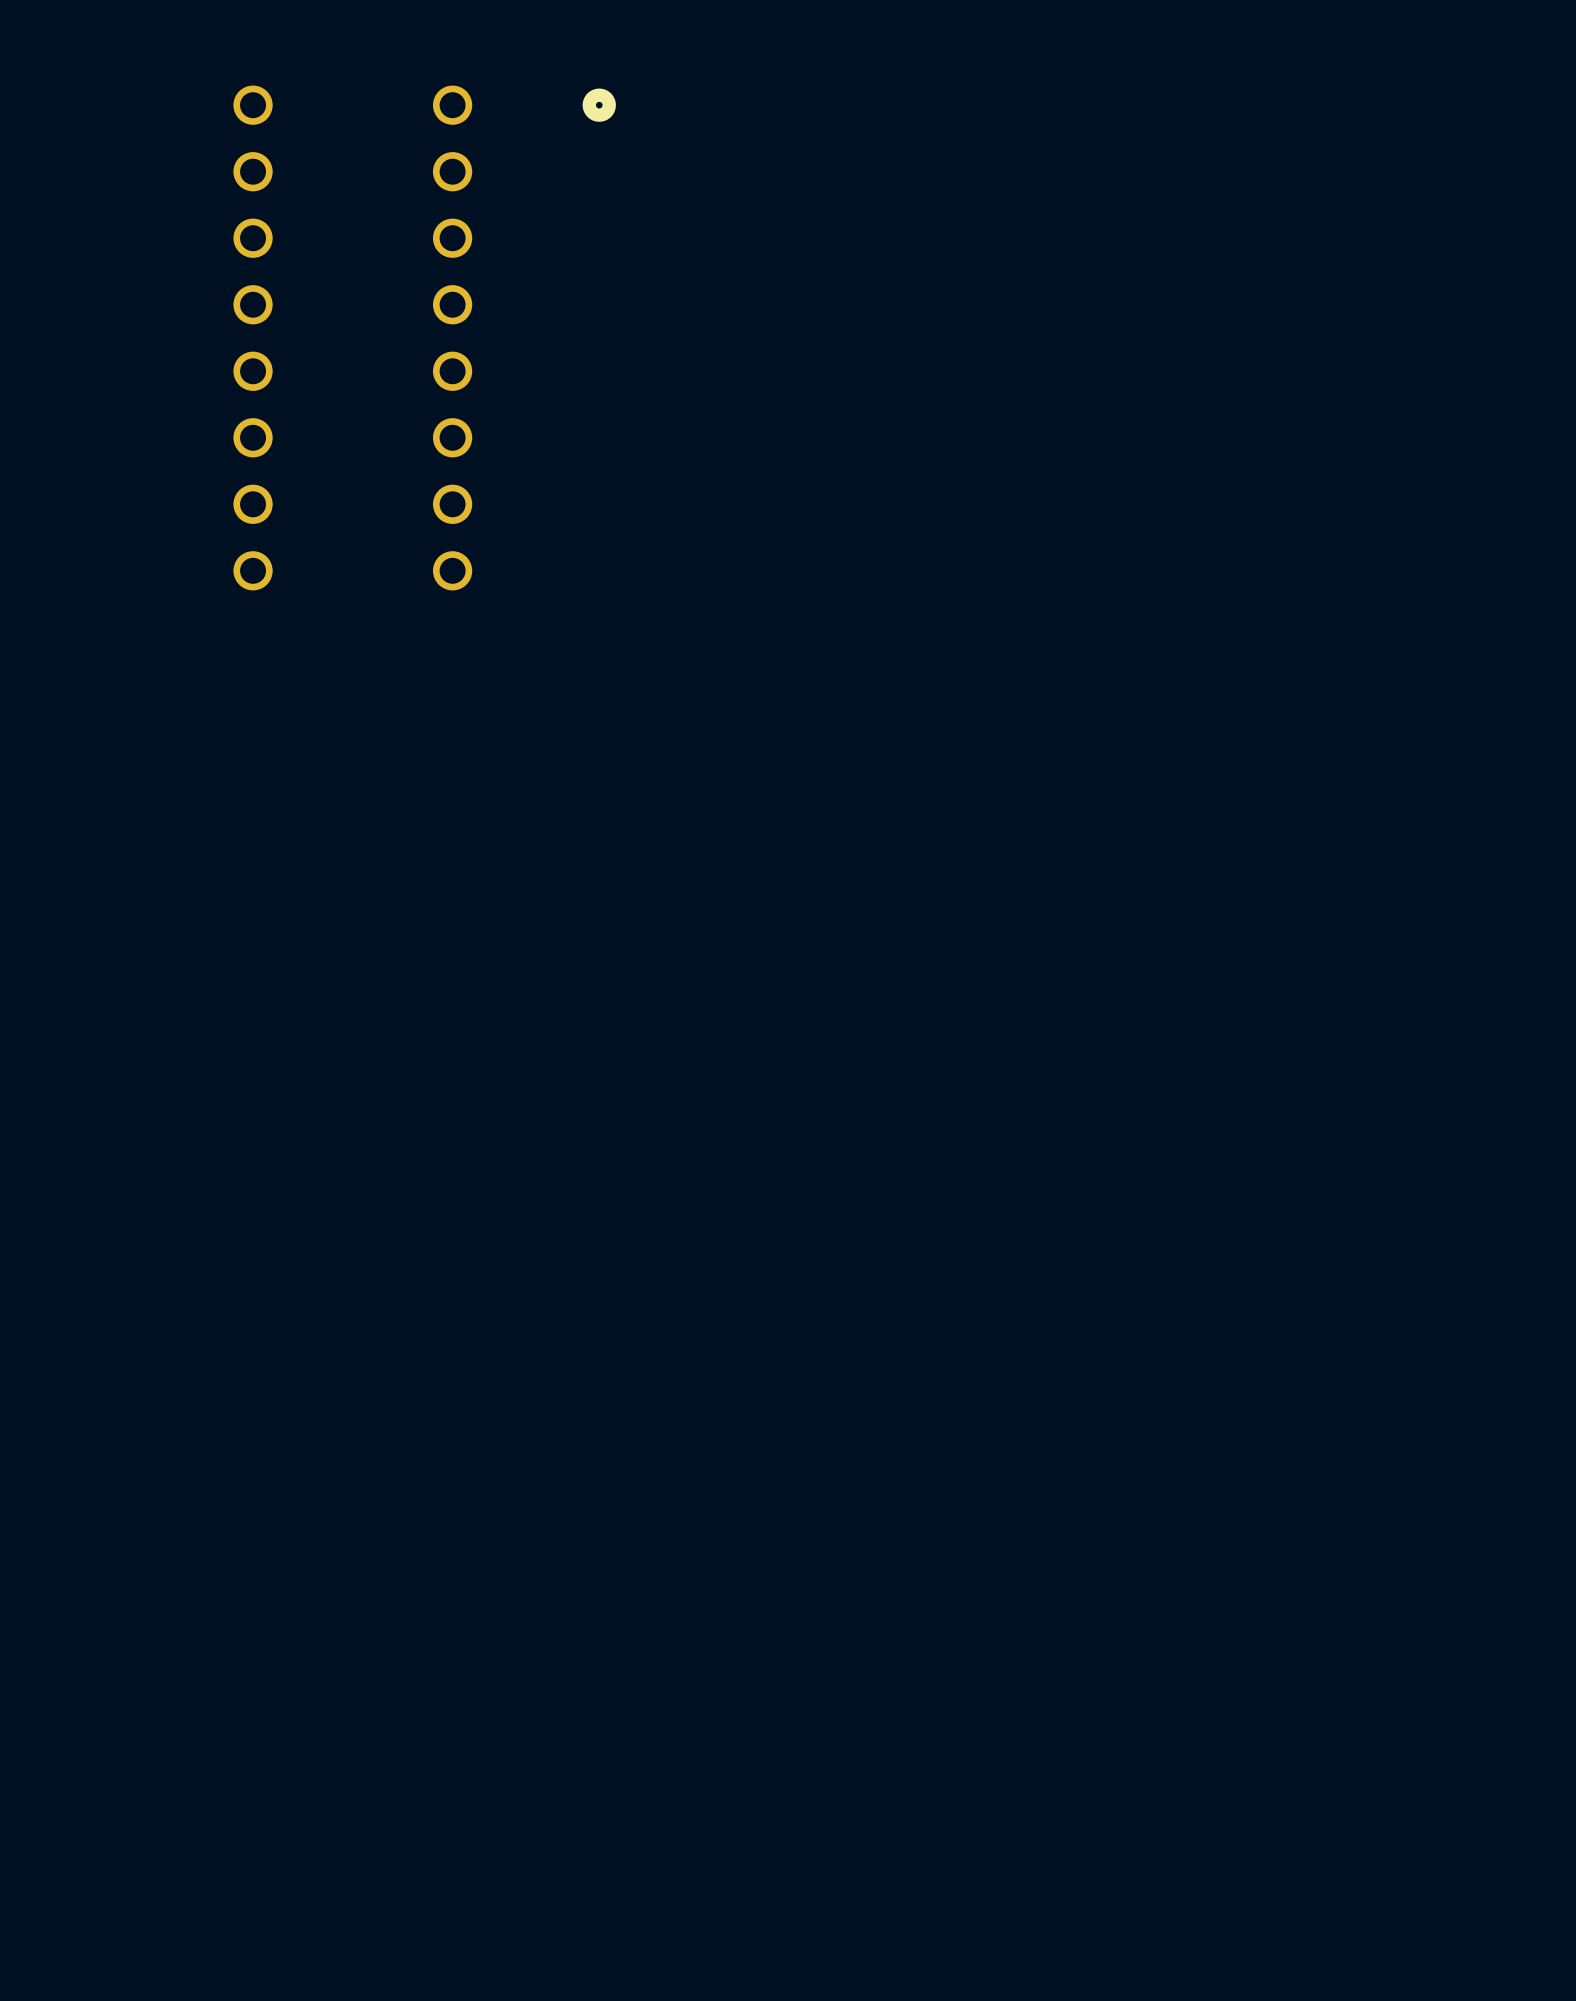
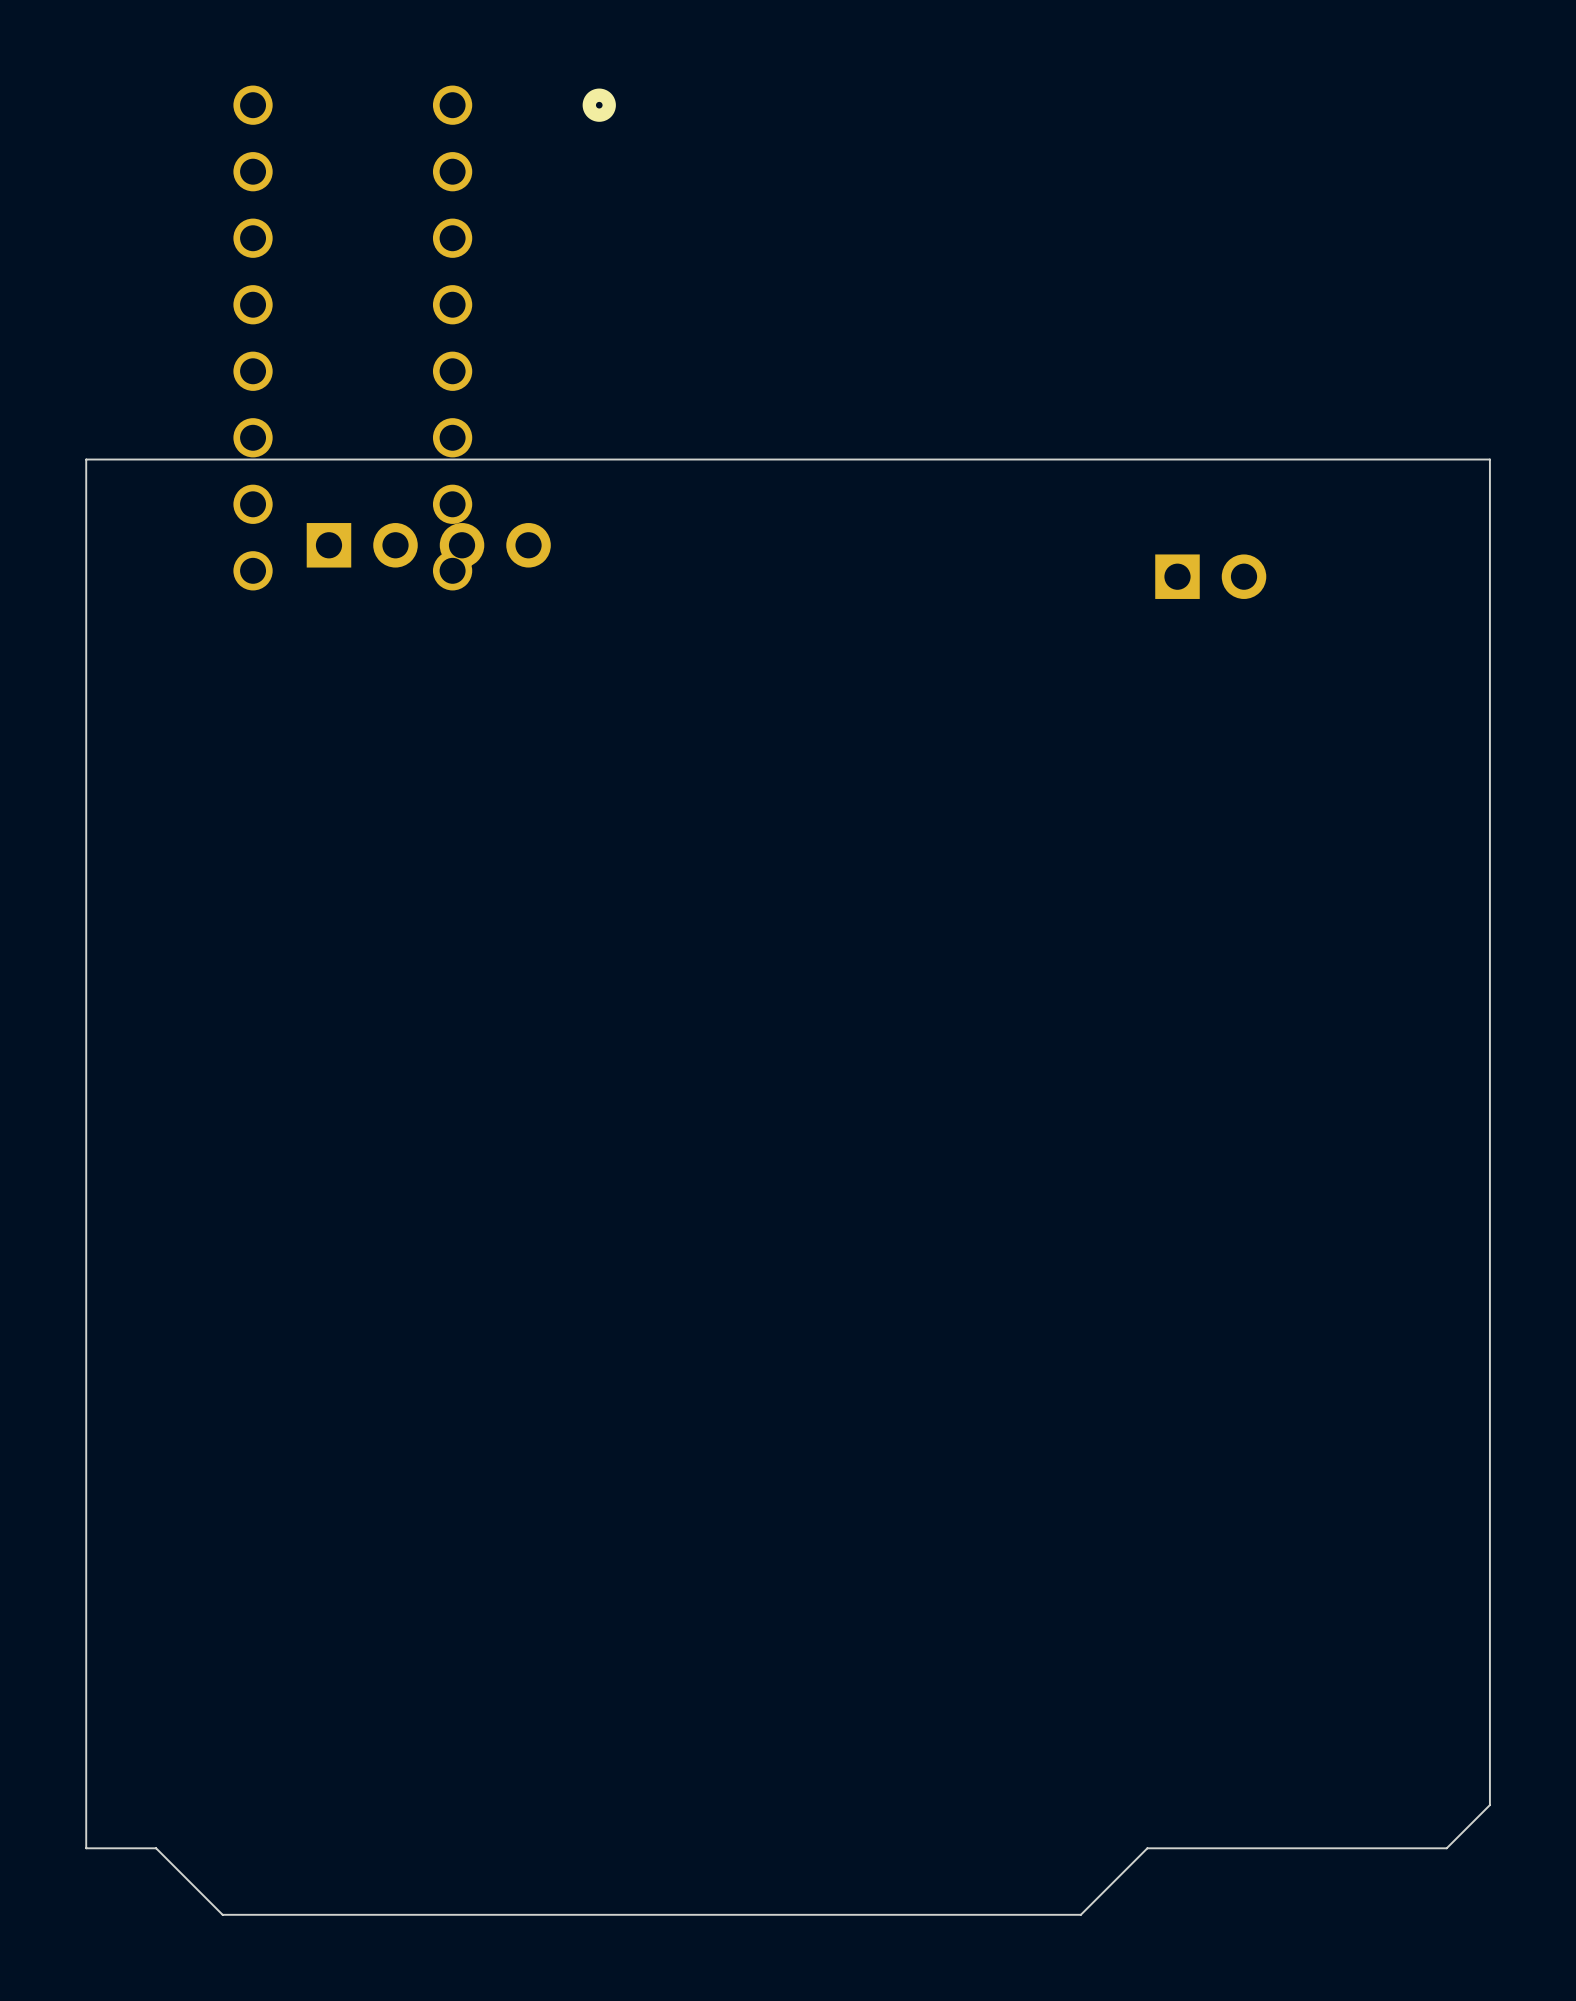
board edge: none -> (1489, 459) (86, 459) (86, 1848) (156, 1848) (222, 1914) (1080, 1914) (1147, 1848) (1446, 1848) (1489, 1805) (1489, 459)
part: none -> (428, 545)
part: none -> (1210, 576)

